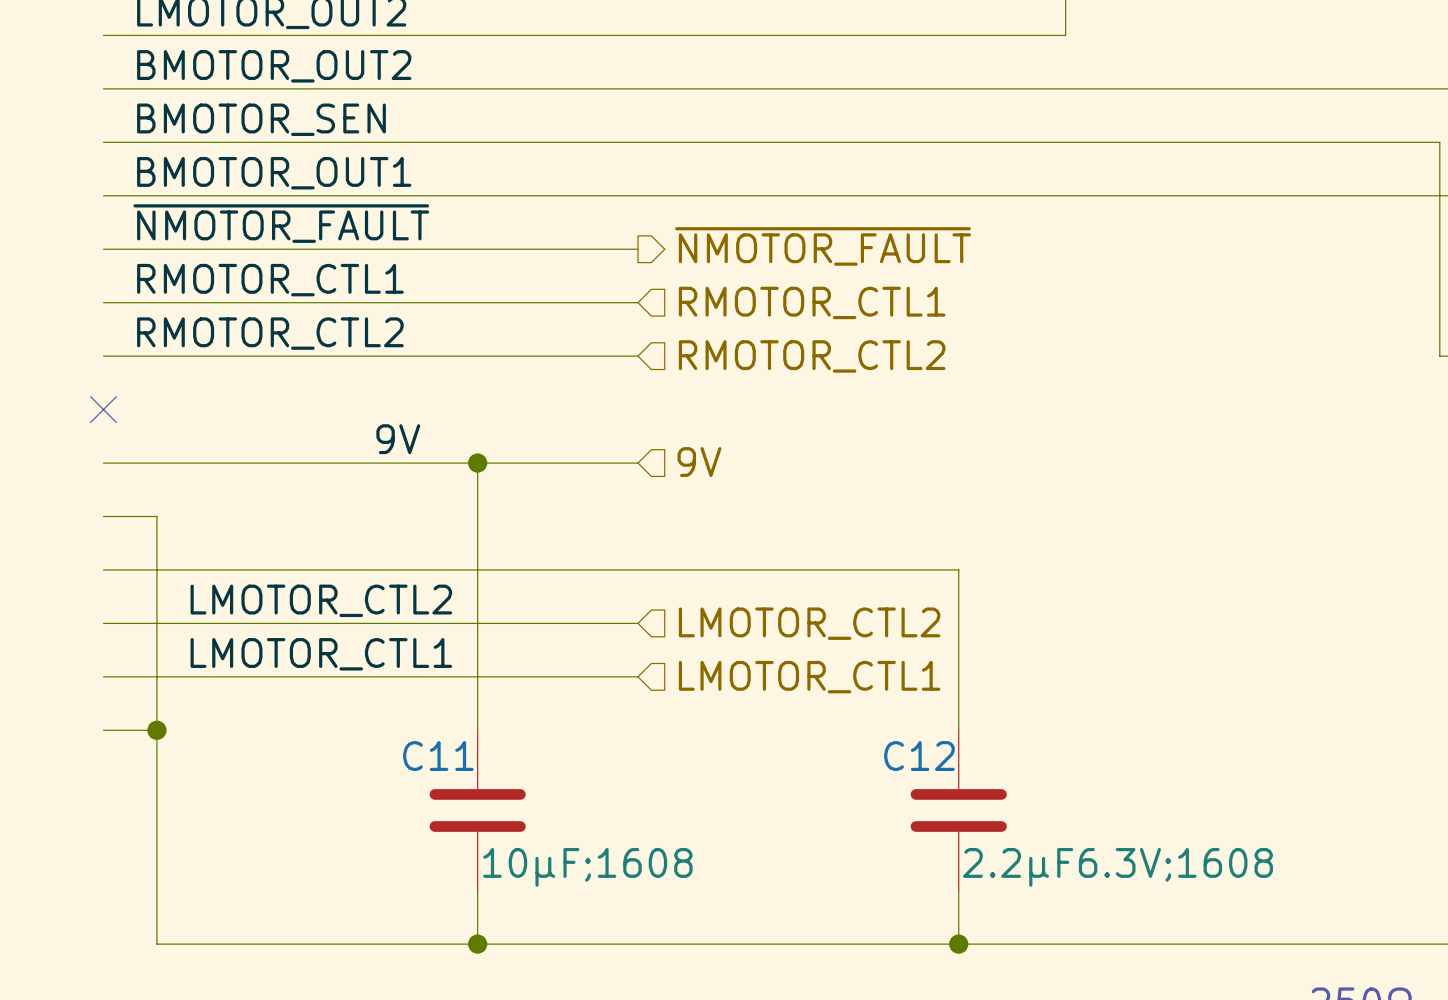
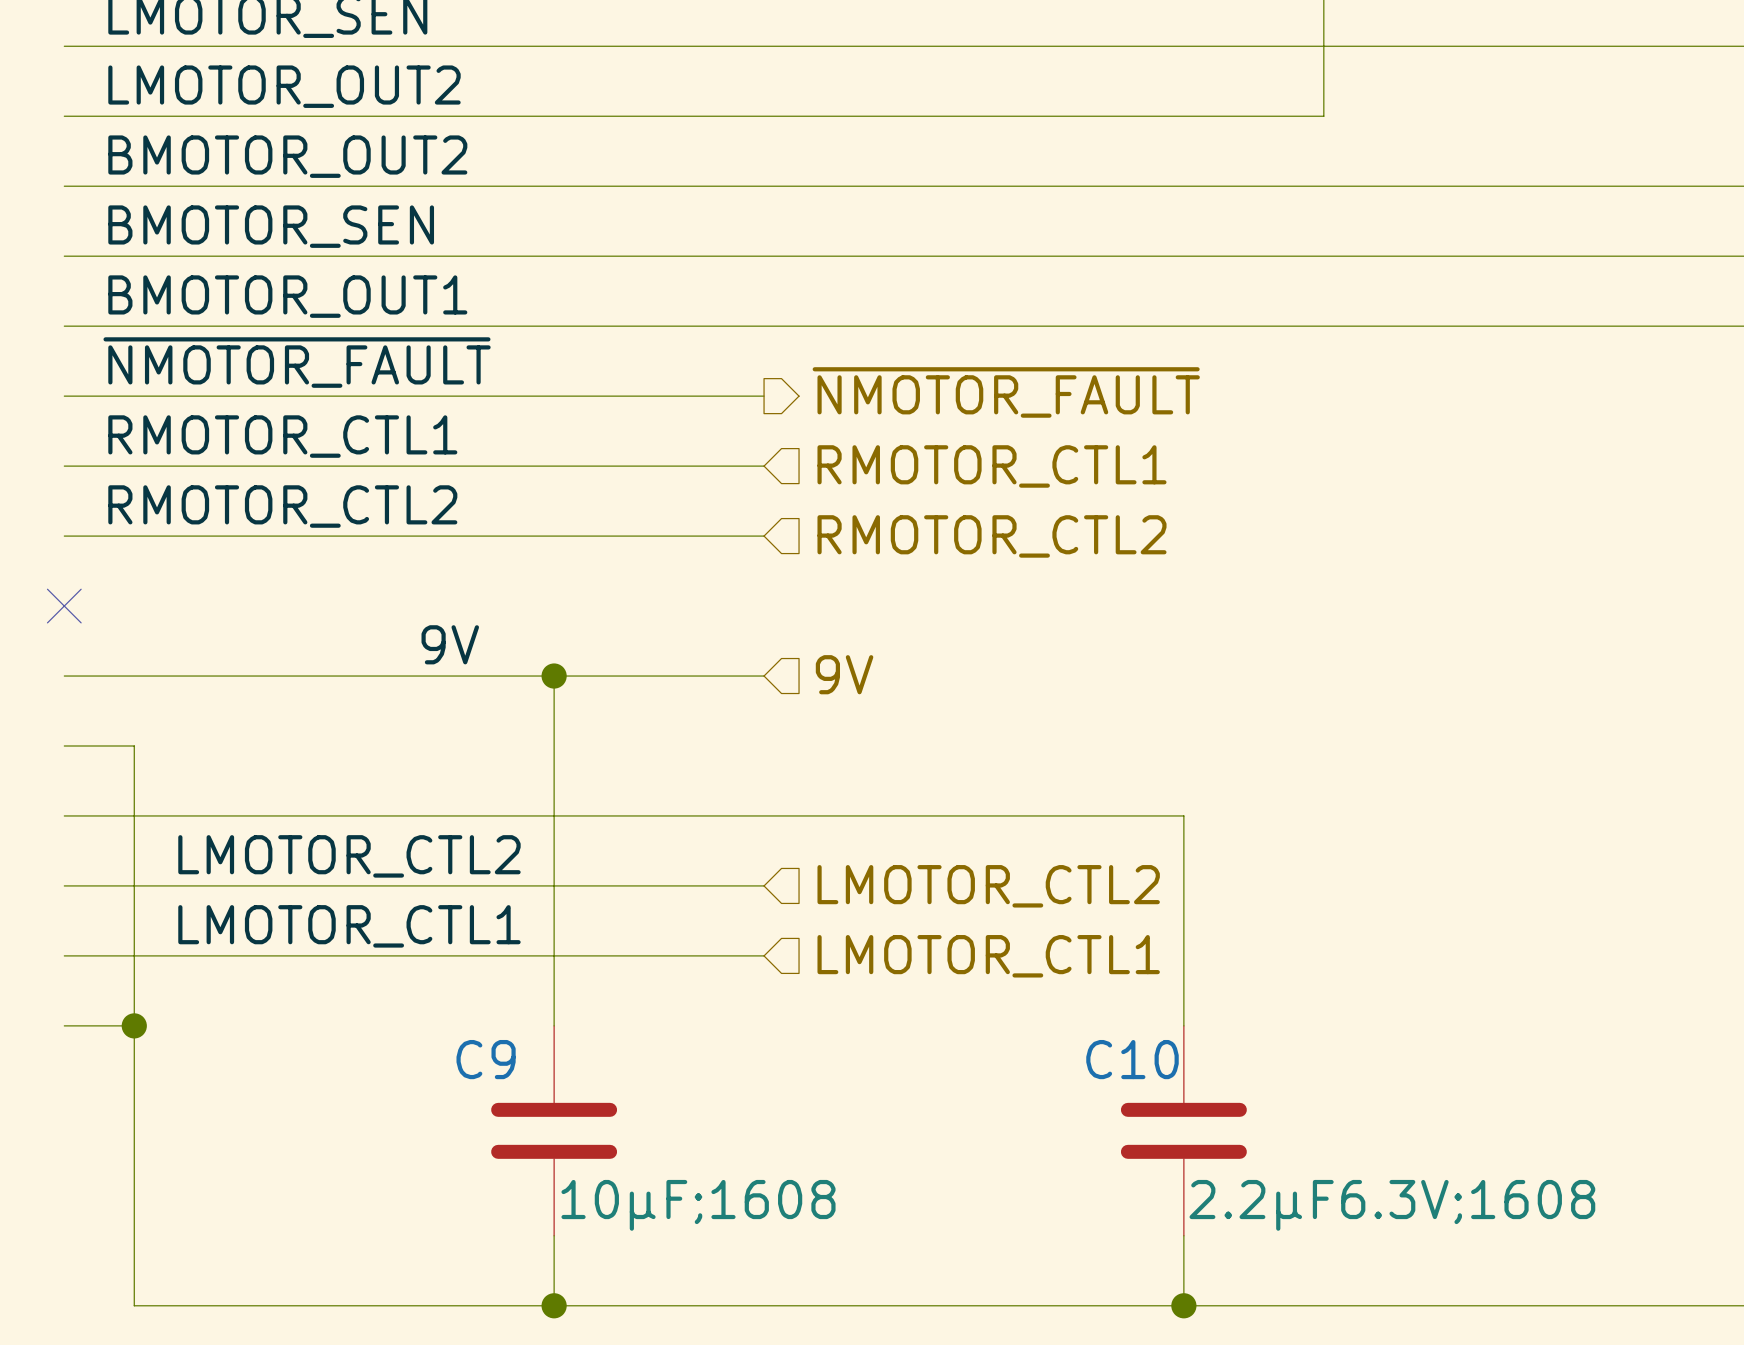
C11 name: C11 (438, 756) -> C9 (486, 1059)
C12 name: C12 (919, 756) -> C10 (1132, 1059)

